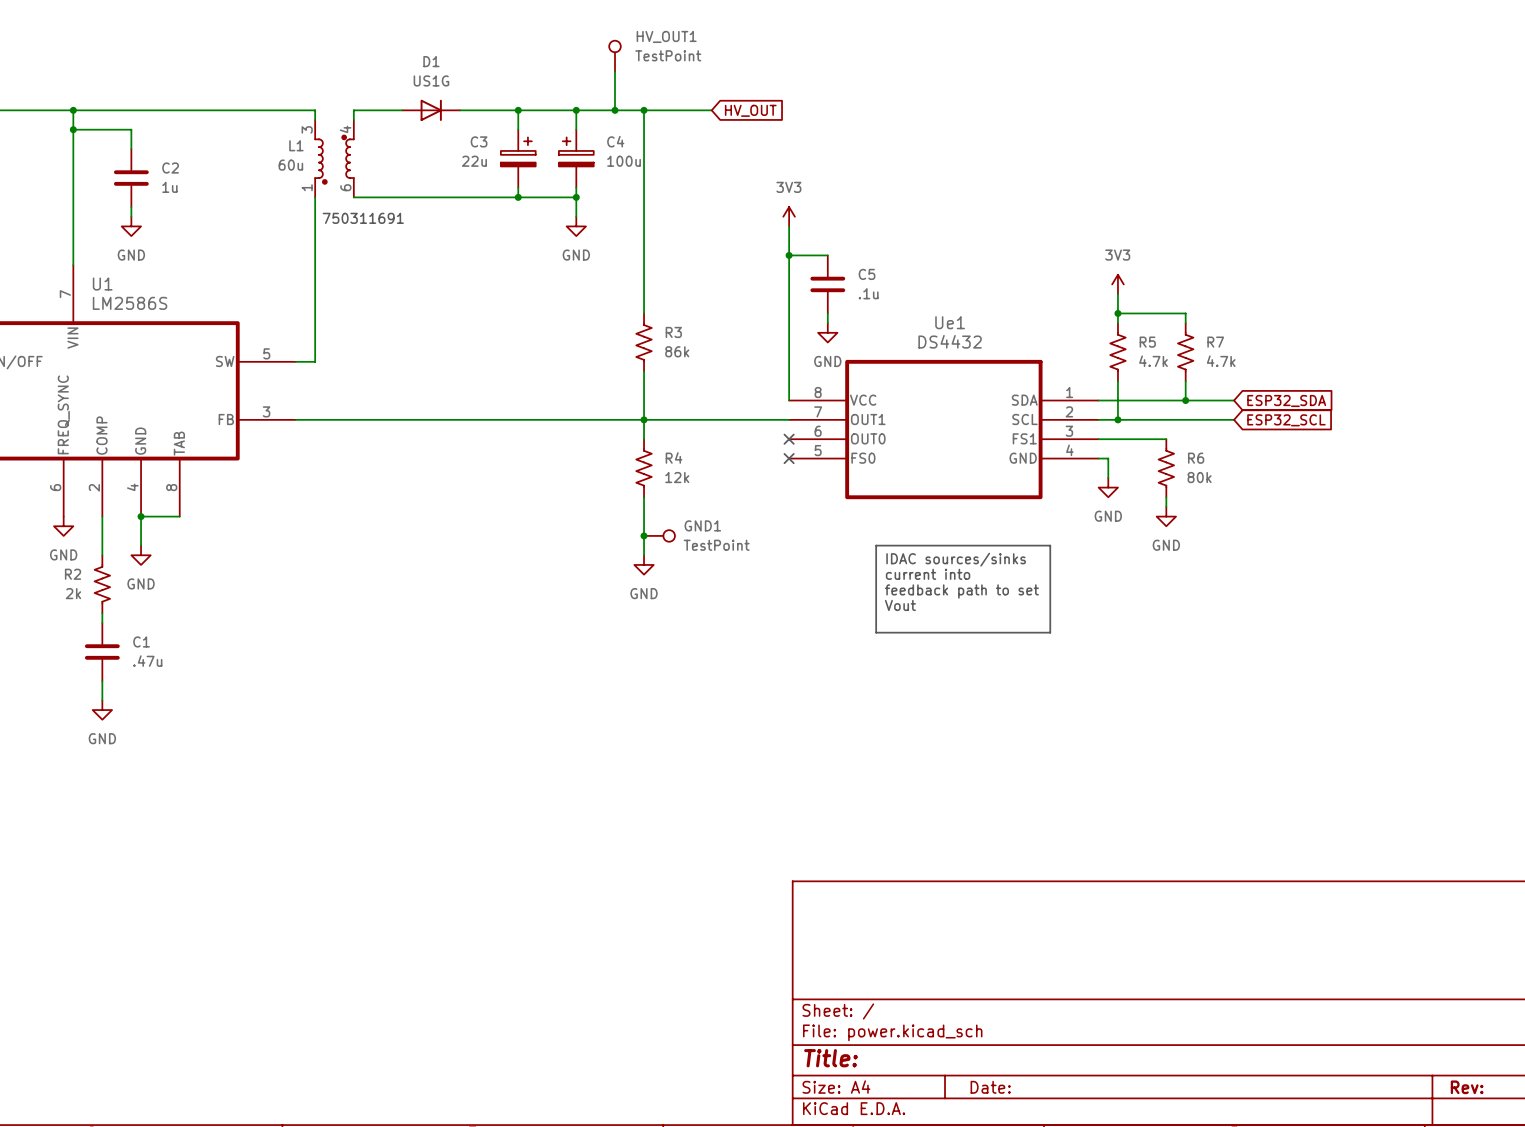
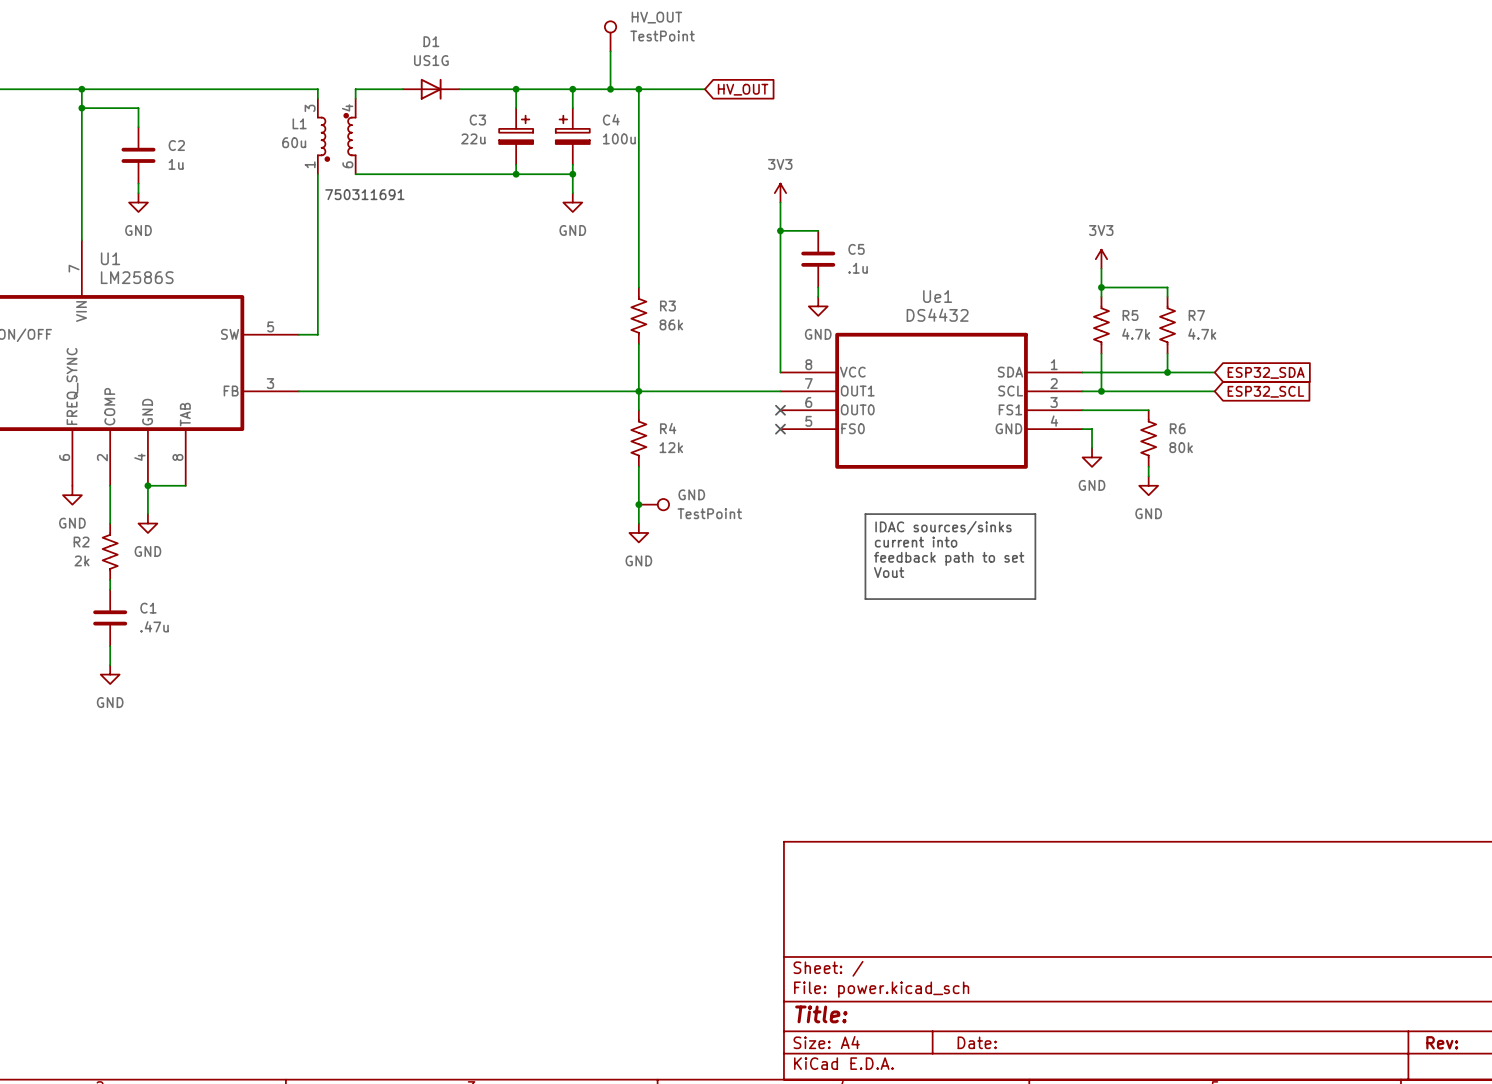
HV_OUT1 name: HV_OUT1 (666, 36) -> HV_OUT (656, 17)
GND1 name: GND1 (702, 525) -> GND (691, 494)

